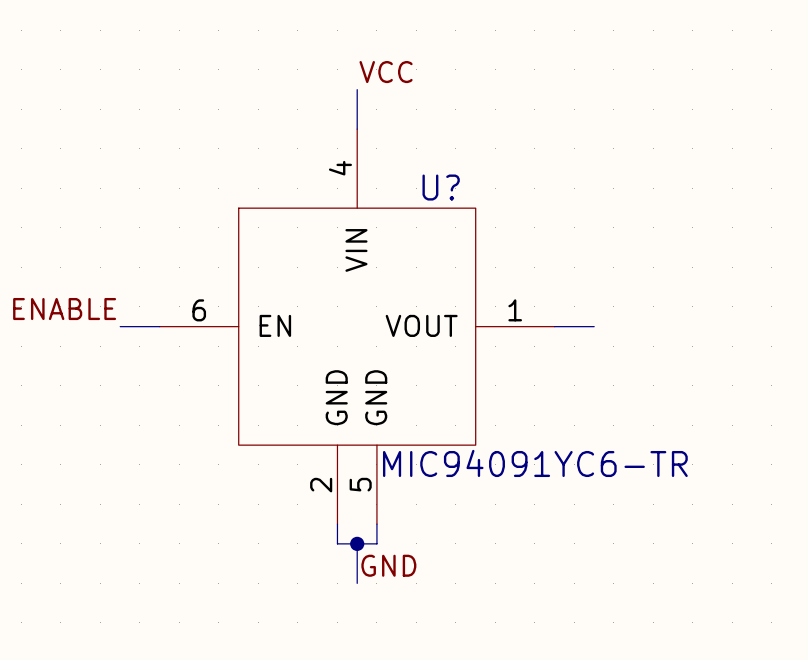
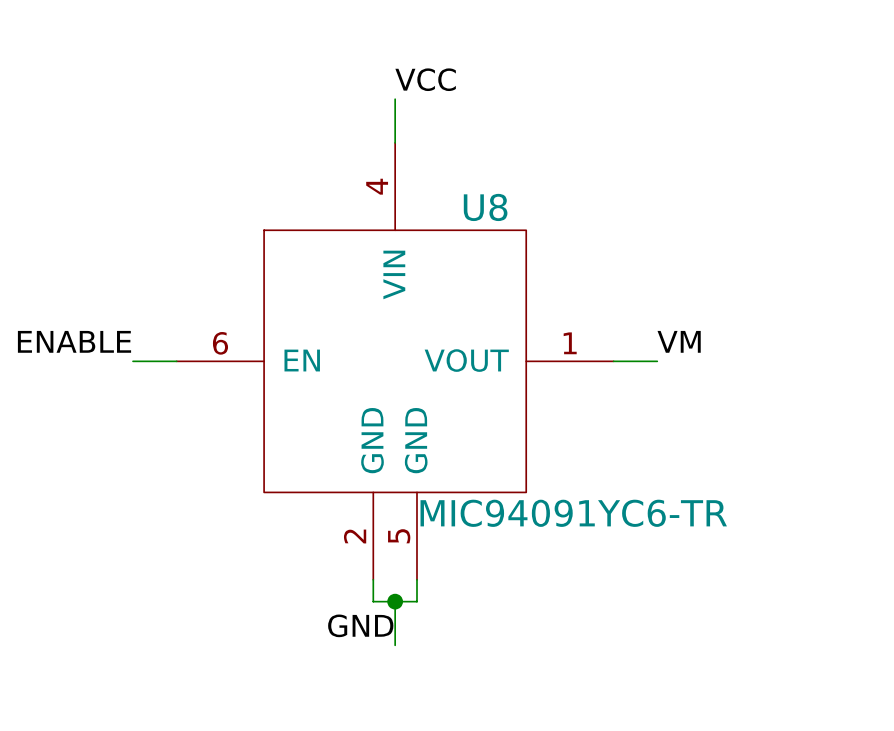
U? name: U? (441, 187) -> U8 (485, 207)
label: none -> VM (679, 341)
label position: GND (388, 565) -> GND (360, 625)

